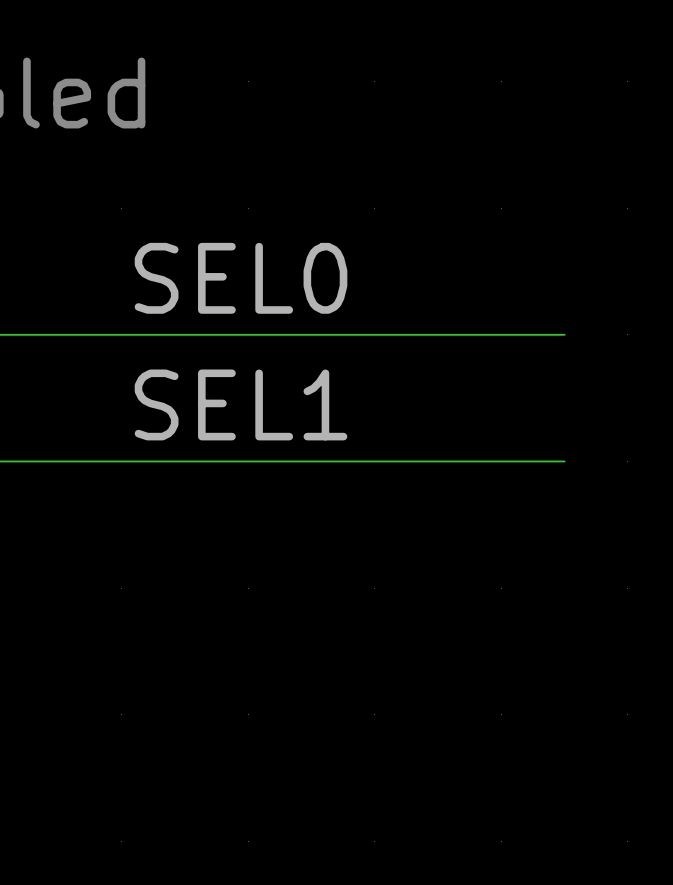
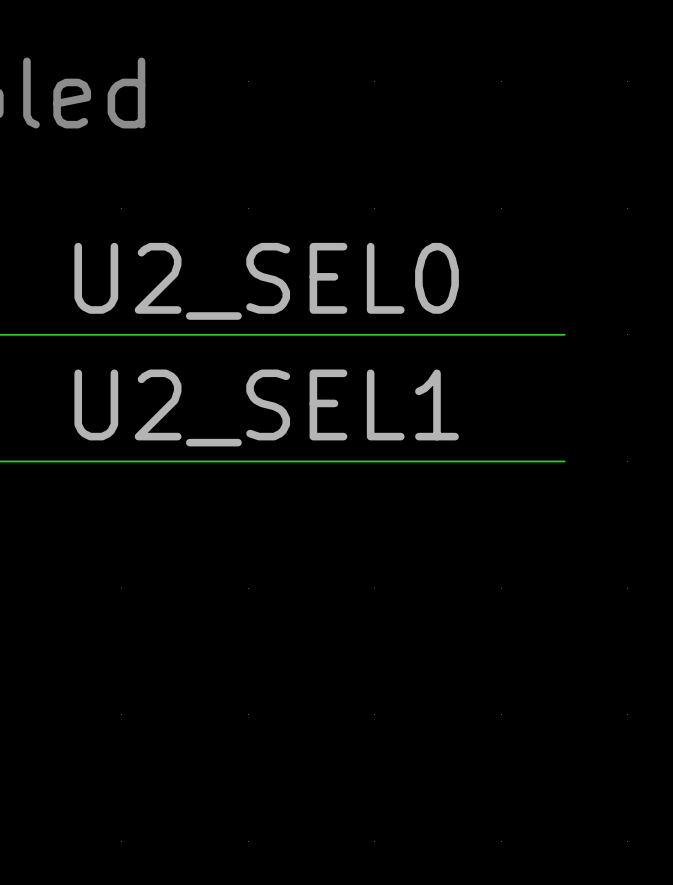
label: SEL0 (241, 278) -> U2_SEL0 (266, 281)
label: SEL1 (241, 404) -> U2_SEL1 (266, 407)

